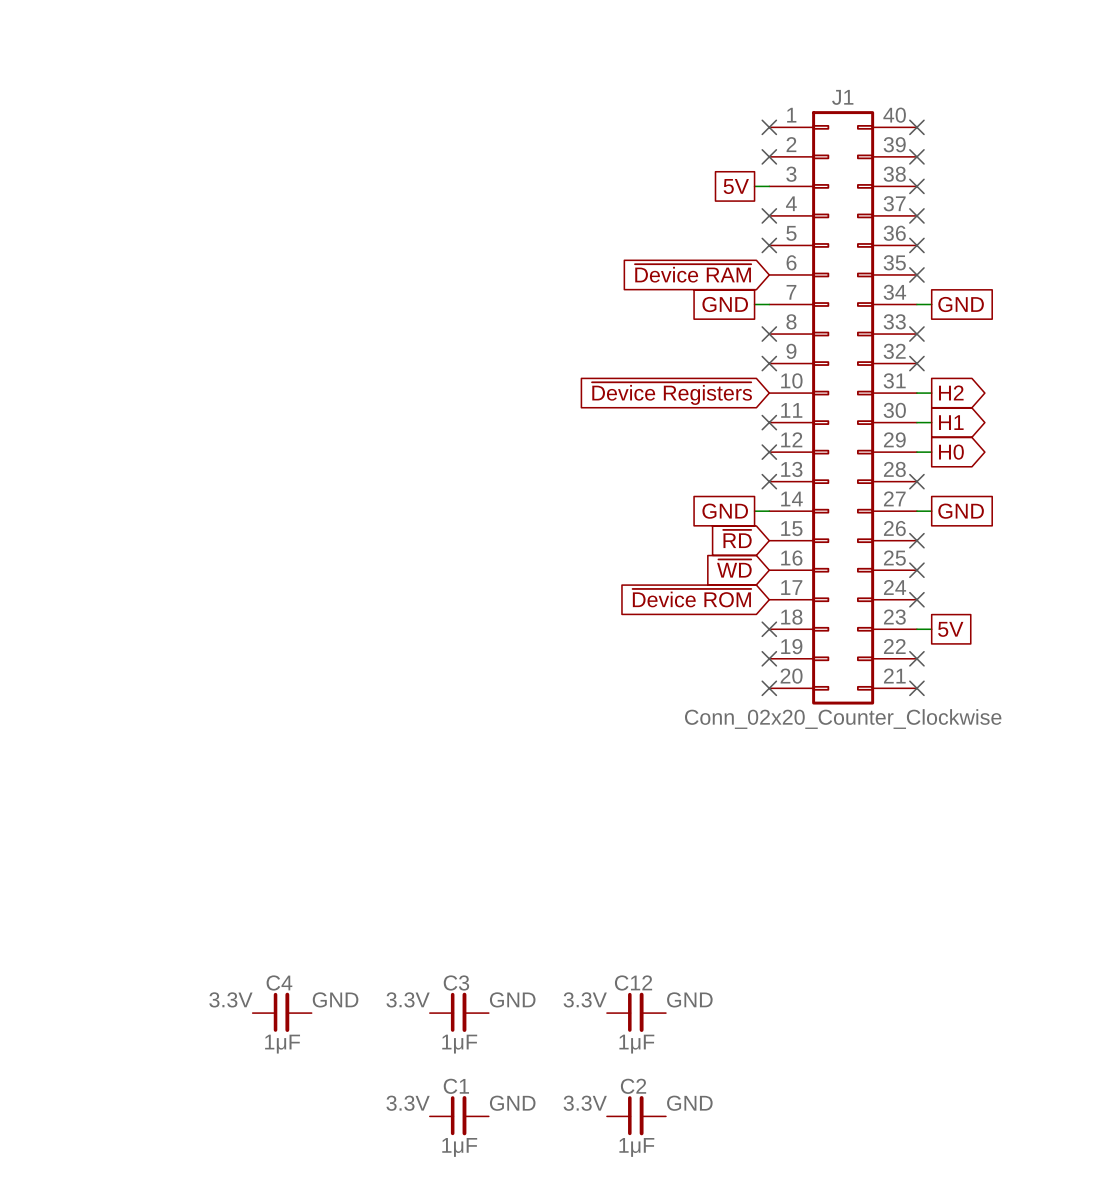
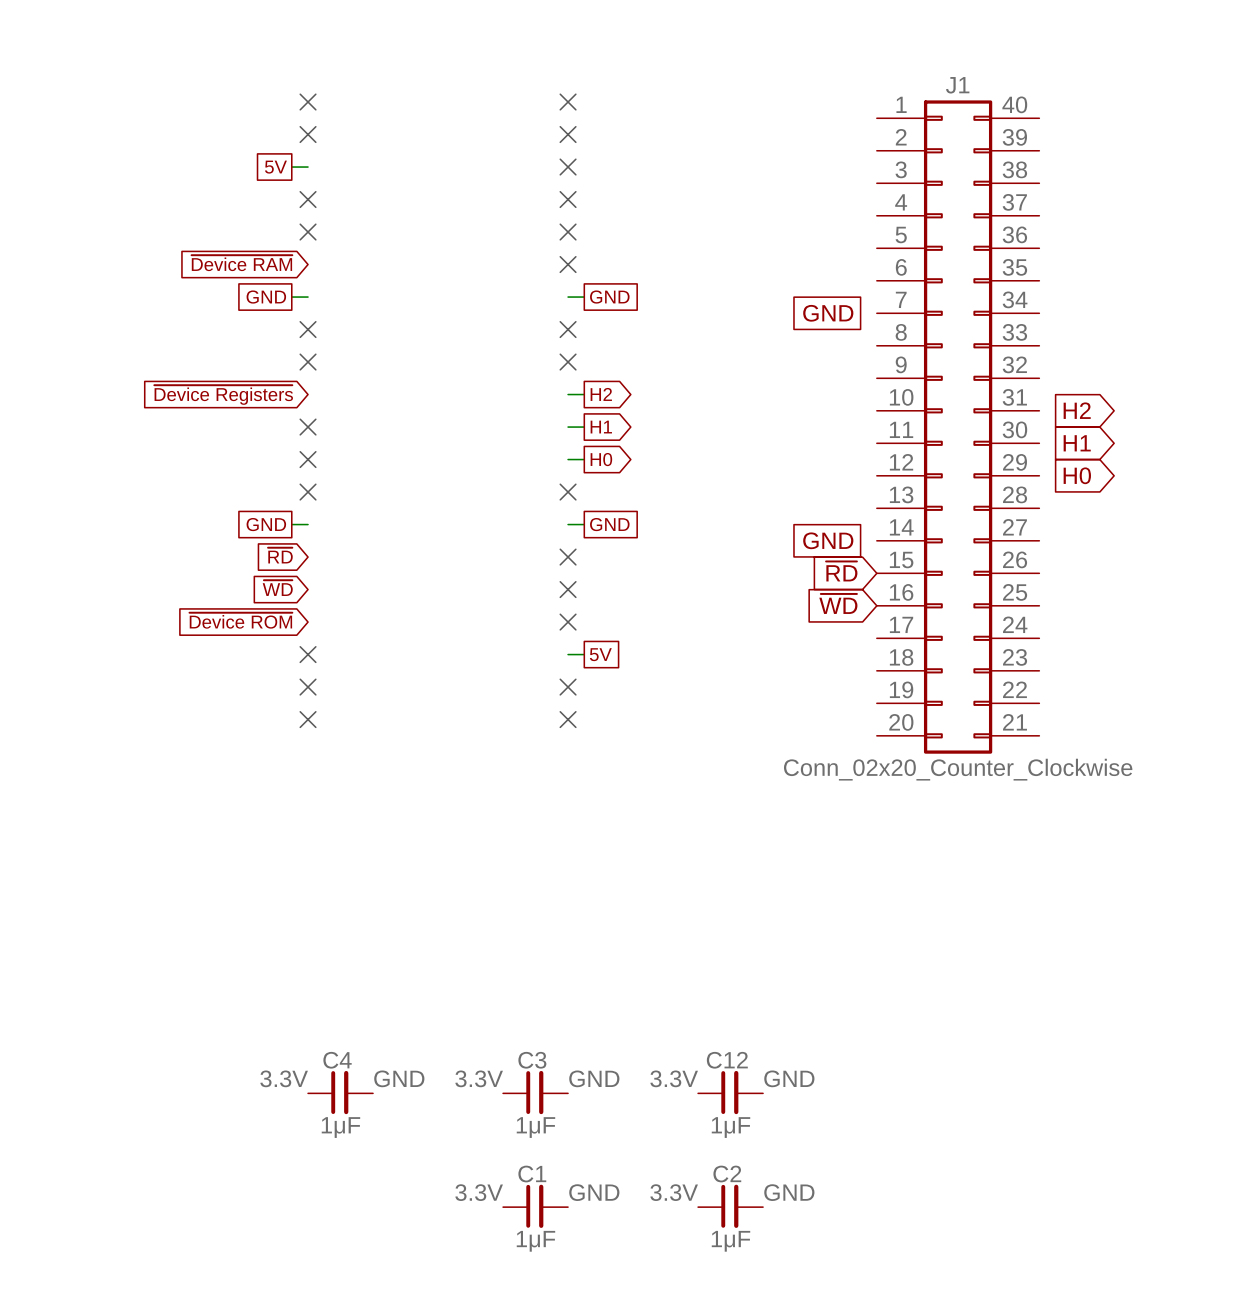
no-connect mark: none -> (308, 102)
no-connect mark: none -> (568, 102)
no-connect mark: (769, 127) -> none
no-connect mark: (916, 127) -> none
no-connect mark: none -> (308, 134)
no-connect mark: none -> (568, 134)
no-connect mark: (769, 156) -> none
no-connect mark: (916, 156) -> none
global label: none -> 5V (275, 167)
wire: none -> (291, 167) (308, 167)
no-connect mark: none -> (568, 167)
global label: 5V (736, 186) -> none
wire: (754, 186) (769, 186) -> (568, 297) (584, 297)
no-connect mark: (916, 186) -> none
no-connect mark: none -> (308, 199)
no-connect mark: none -> (568, 199)
no-connect mark: (769, 215) -> none
no-connect mark: (916, 215) -> none
no-connect mark: none -> (308, 232)
no-connect mark: none -> (568, 232)
no-connect mark: (769, 245) -> none
no-connect mark: (916, 245) -> none
global label: none -> ~{Device RAM} (241, 263)
no-connect mark: none -> (568, 264)
global label: ~{Device RAM} (693, 273) -> none
no-connect mark: (916, 274) -> none
global label: none -> GND (266, 297)
wire: none -> (291, 297) (308, 297)
global label: none -> GND (609, 297)
wire: (754, 304) (769, 304) -> (568, 427) (584, 427)
wire: (916, 304) (931, 304) -> none
global label: GND (961, 304) -> none
no-connect mark: none -> (308, 329)
no-connect mark: none -> (568, 329)
no-connect mark: (769, 334) -> none
no-connect mark: (916, 334) -> none
no-connect mark: none -> (308, 362)
no-connect mark: none -> (568, 362)
no-connect mark: (769, 363) -> none
no-connect mark: (916, 363) -> none
global label: none -> ~{Device Registers} (223, 395)
wire: none -> (568, 394) (584, 394)
global label: none -> H2 (601, 394)
global label: ~{Device Registers} (671, 393) -> none
wire: (916, 393) (931, 393) -> none
no-connect mark: none -> (308, 427)
global label: none -> H1 (601, 427)
no-connect mark: (769, 422) -> none
wire: (916, 422) (931, 422) -> none
no-connect mark: none -> (308, 459)
wire: none -> (568, 459) (584, 459)
global label: none -> H0 (601, 459)
no-connect mark: (769, 452) -> none
wire: (916, 452) (931, 452) -> none
no-connect mark: none -> (308, 492)
no-connect mark: none -> (568, 492)
no-connect mark: (769, 481) -> none
no-connect mark: (916, 481) -> none
global label: none -> GND (266, 524)
wire: none -> (291, 524) (308, 524)
wire: none -> (568, 524) (584, 524)
global label: none -> GND (609, 524)
wire: (754, 511) (769, 511) -> (568, 654) (584, 654)
wire: (916, 511) (931, 511) -> none
global label: GND (961, 511) -> none
global label: none -> ~{RD} (280, 555)
no-connect mark: none -> (568, 557)
no-connect mark: (916, 540) -> none
global label: none -> ~{WD} (277, 588)
no-connect mark: none -> (568, 589)
no-connect mark: (916, 570) -> none
global label: none -> ~{Device ROM} (240, 620)
no-connect mark: none -> (568, 622)
global label: ~{Device ROM} (691, 598) -> none
no-connect mark: (916, 599) -> none
no-connect mark: none -> (308, 654)
global label: none -> 5V (600, 654)
no-connect mark: (769, 629) -> none
wire: (916, 629) (931, 629) -> none
global label: 5V (950, 629) -> none
no-connect mark: none -> (308, 687)
no-connect mark: none -> (568, 687)
no-connect mark: (769, 658) -> none
no-connect mark: (916, 658) -> none
no-connect mark: none -> (308, 719)
no-connect mark: none -> (568, 719)
no-connect mark: (769, 688) -> none
no-connect mark: (916, 688) -> none

